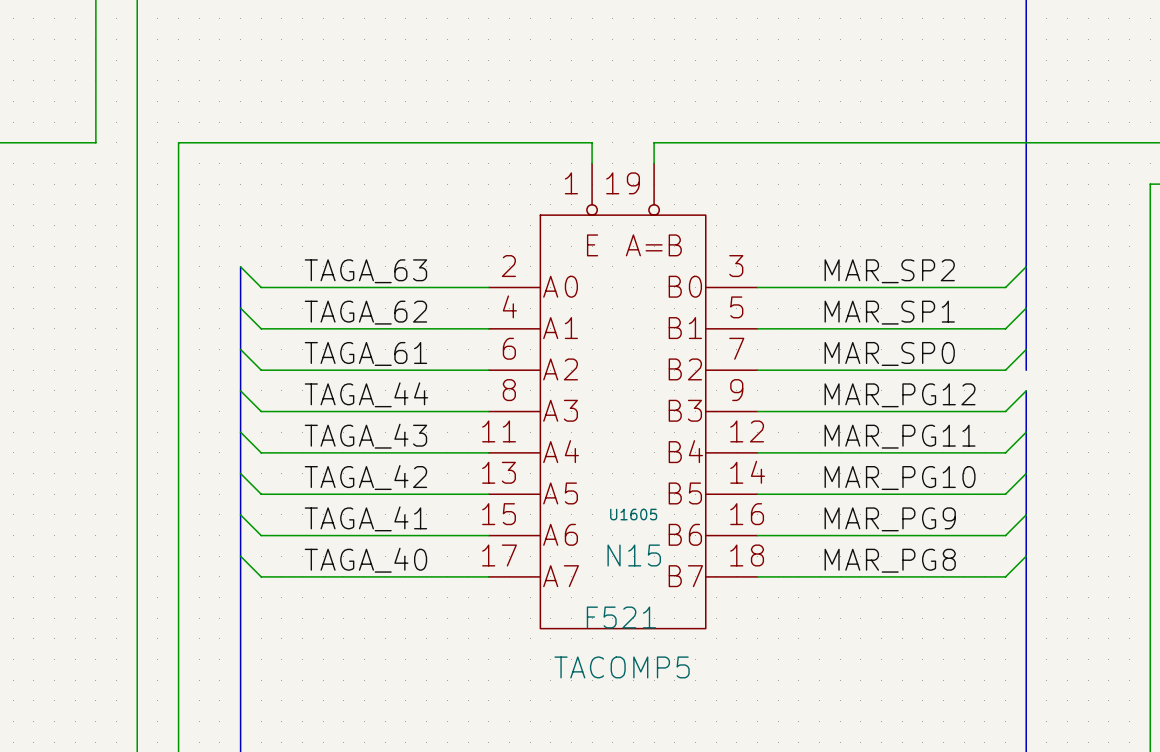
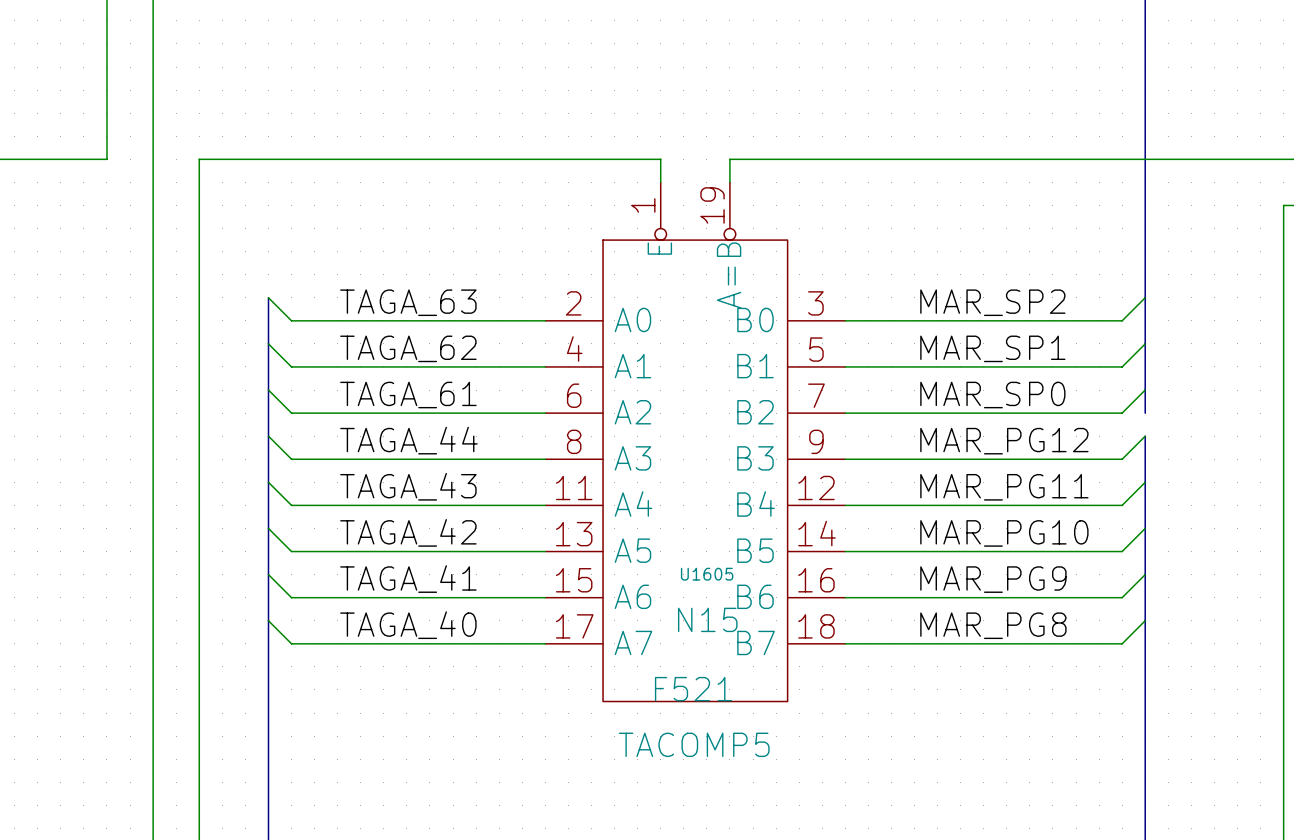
U1605 symbol: [488, 163, 758, 629] -> [545, 182, 846, 702]

